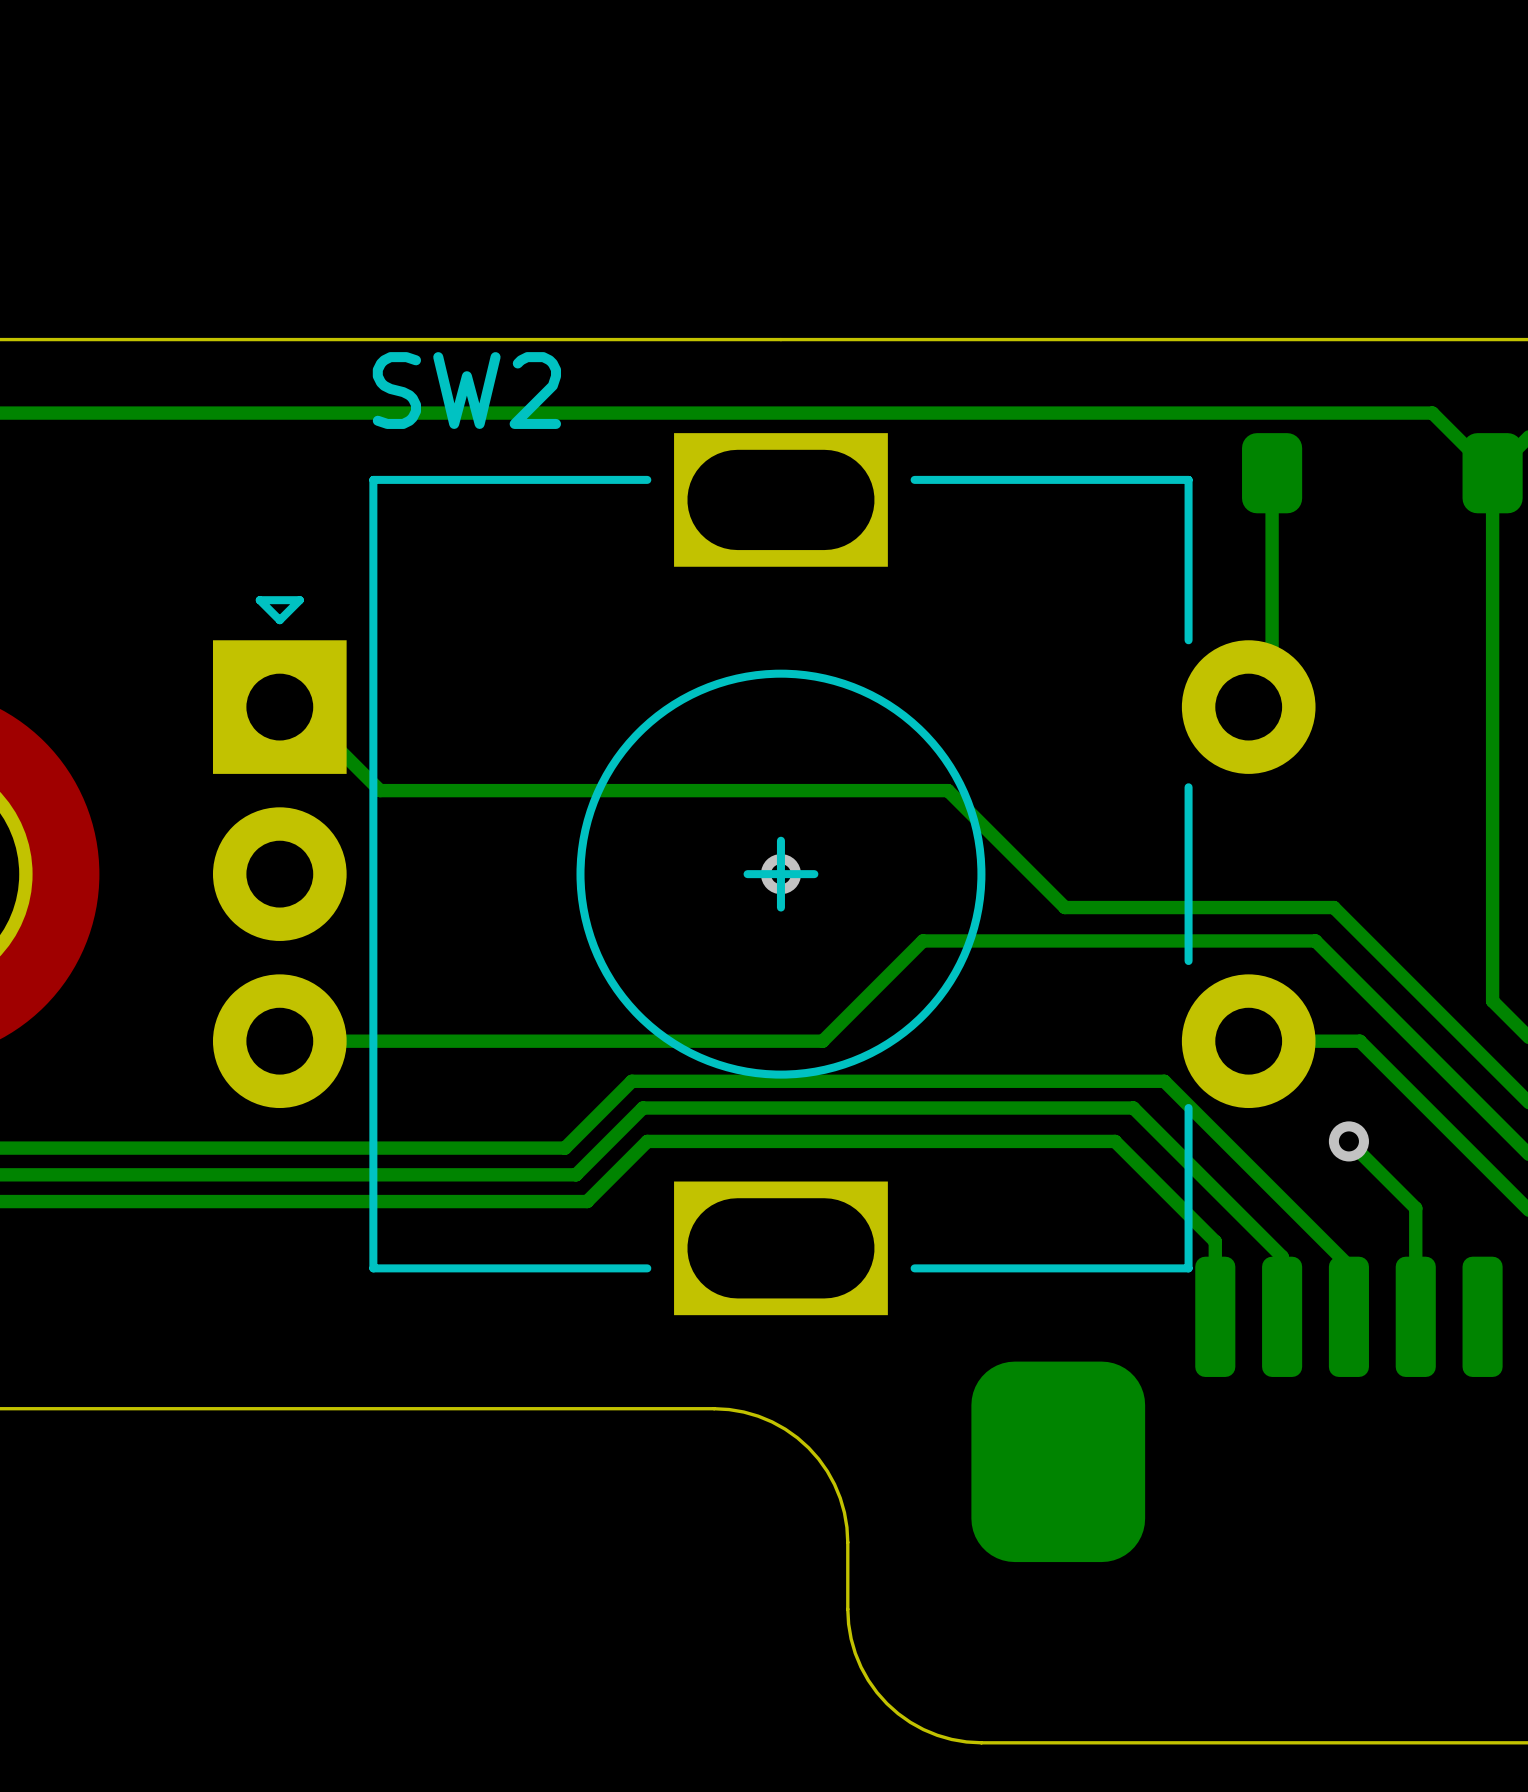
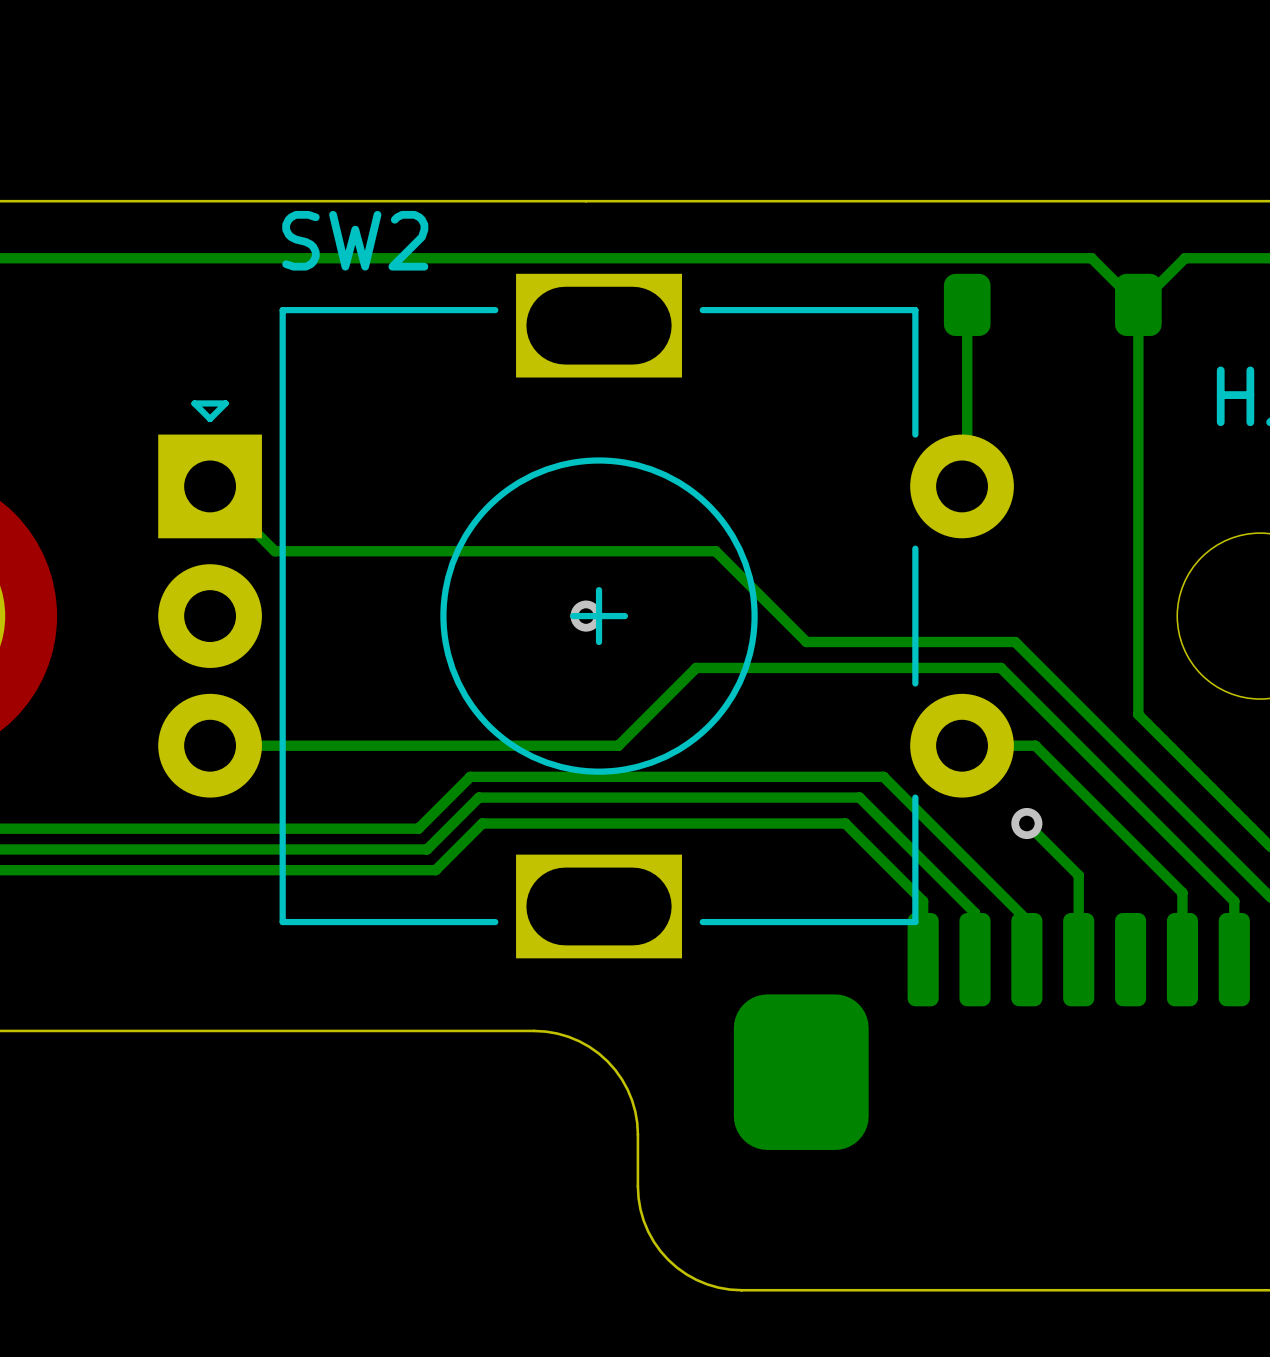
SW2 position: (764, 874) -> (586, 616)

